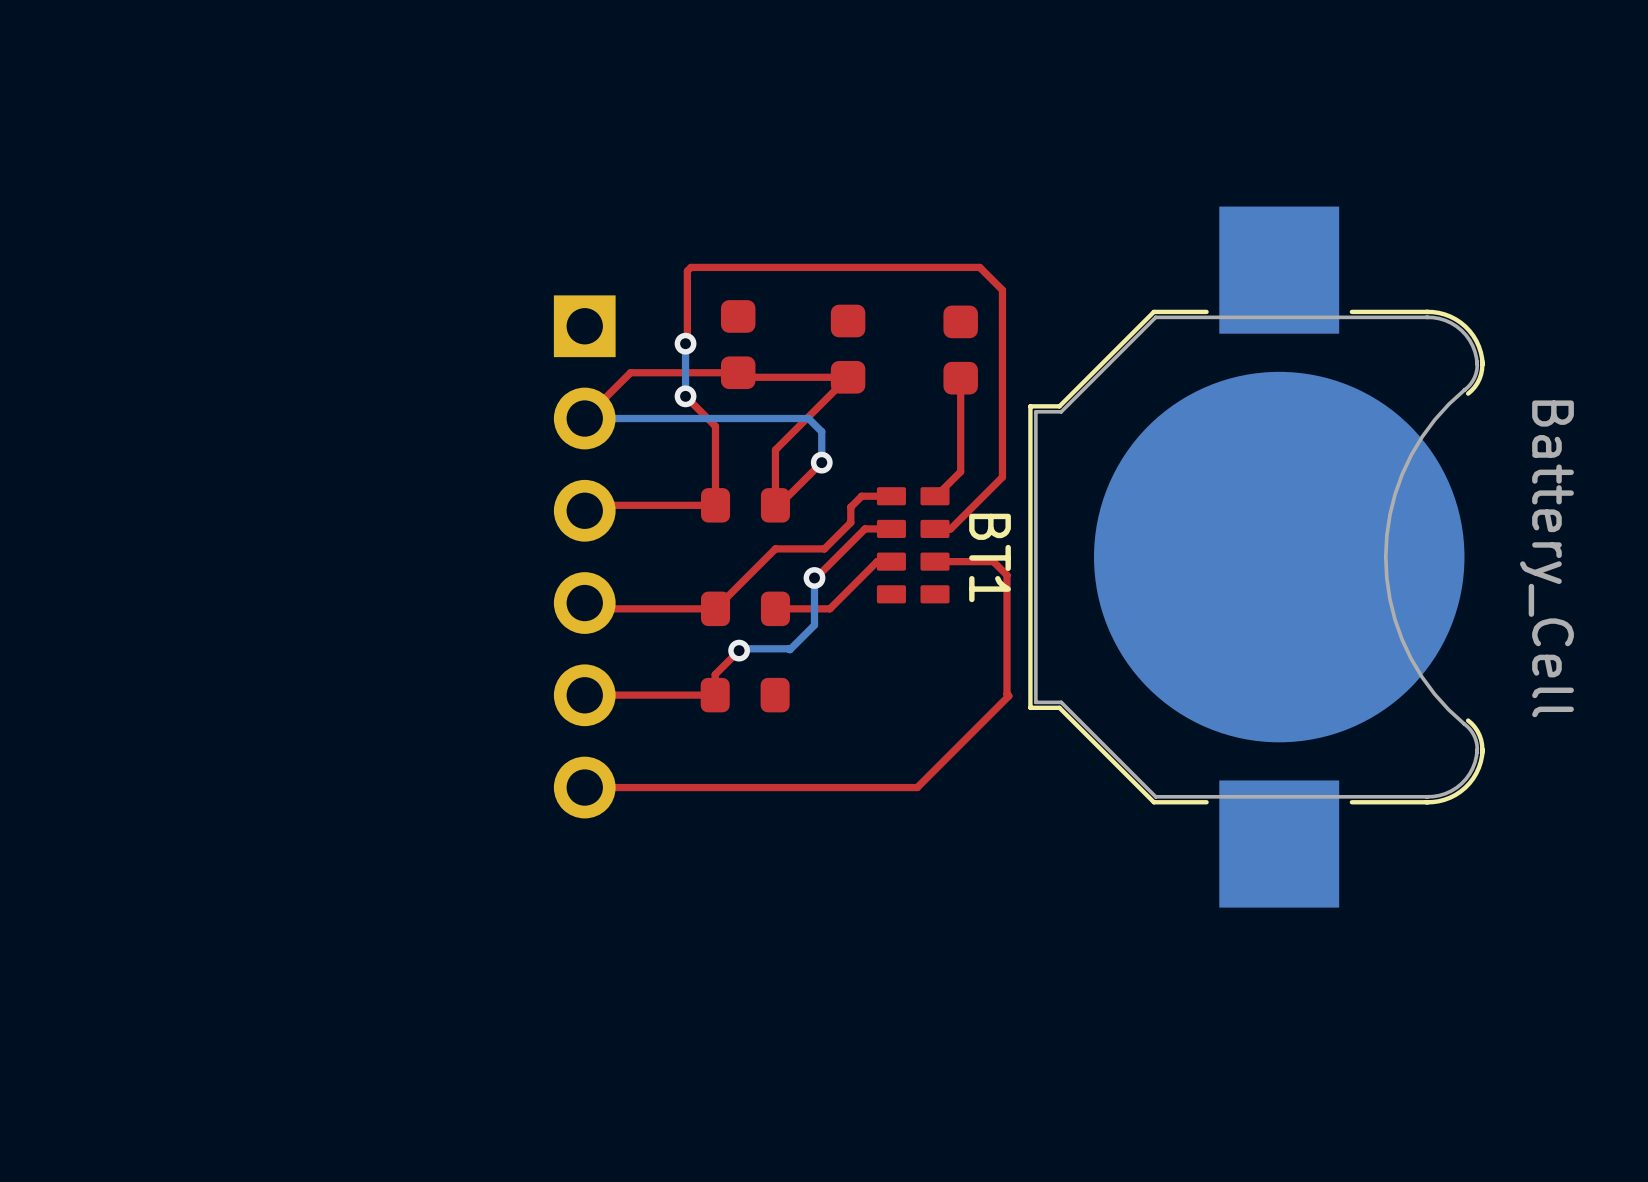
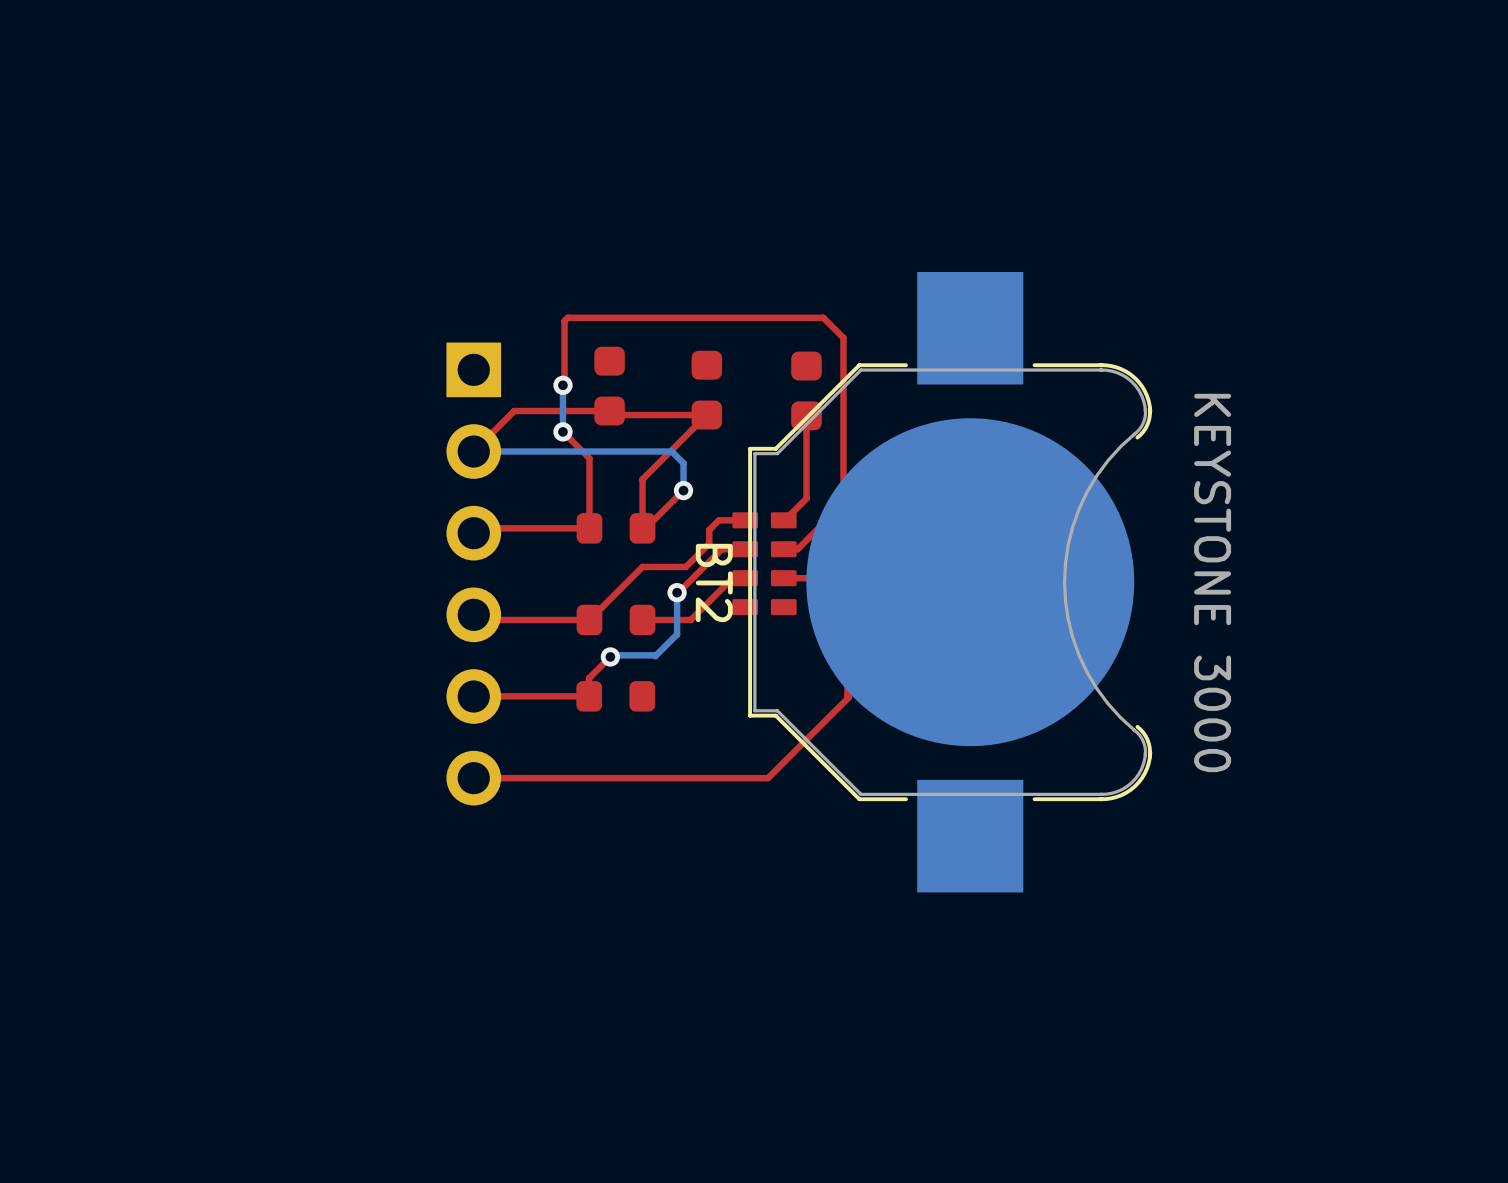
BT1: Battery_Cell (1256, 557) -> none
BT2: none -> KEYSTONE 3000 (950, 582)

